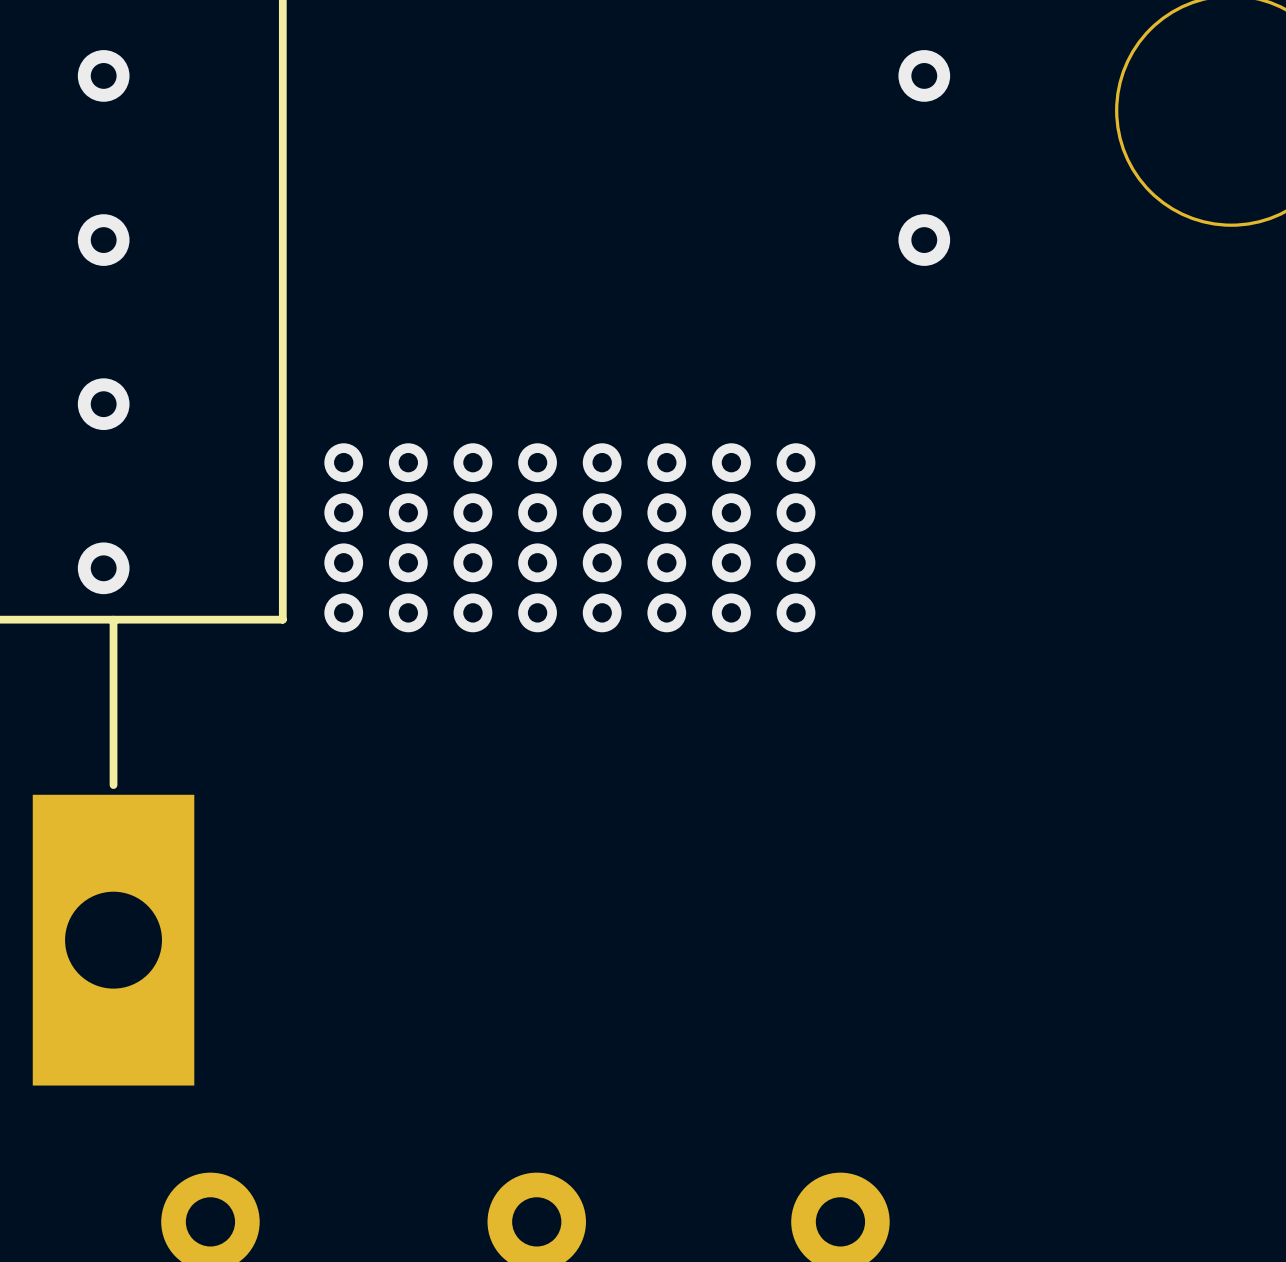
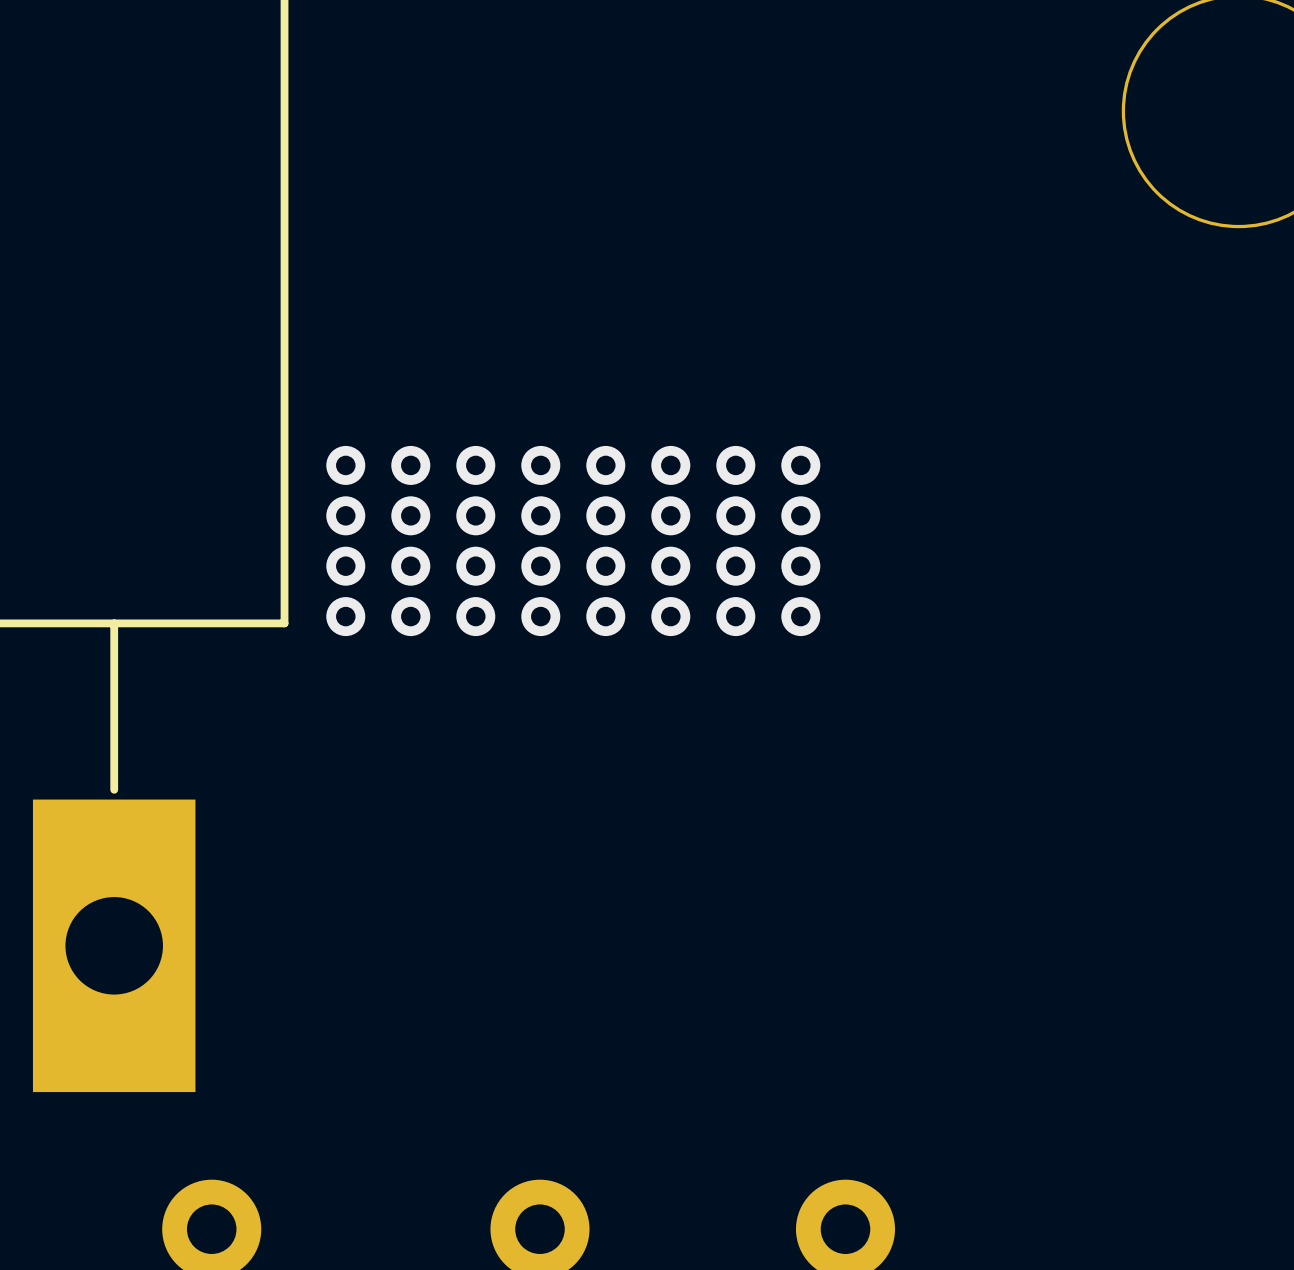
via: (103, 75) -> none
via: (924, 75) -> none
via: (103, 240) -> none
via: (924, 240) -> none
via: (103, 404) -> none
via: (103, 568) -> none

